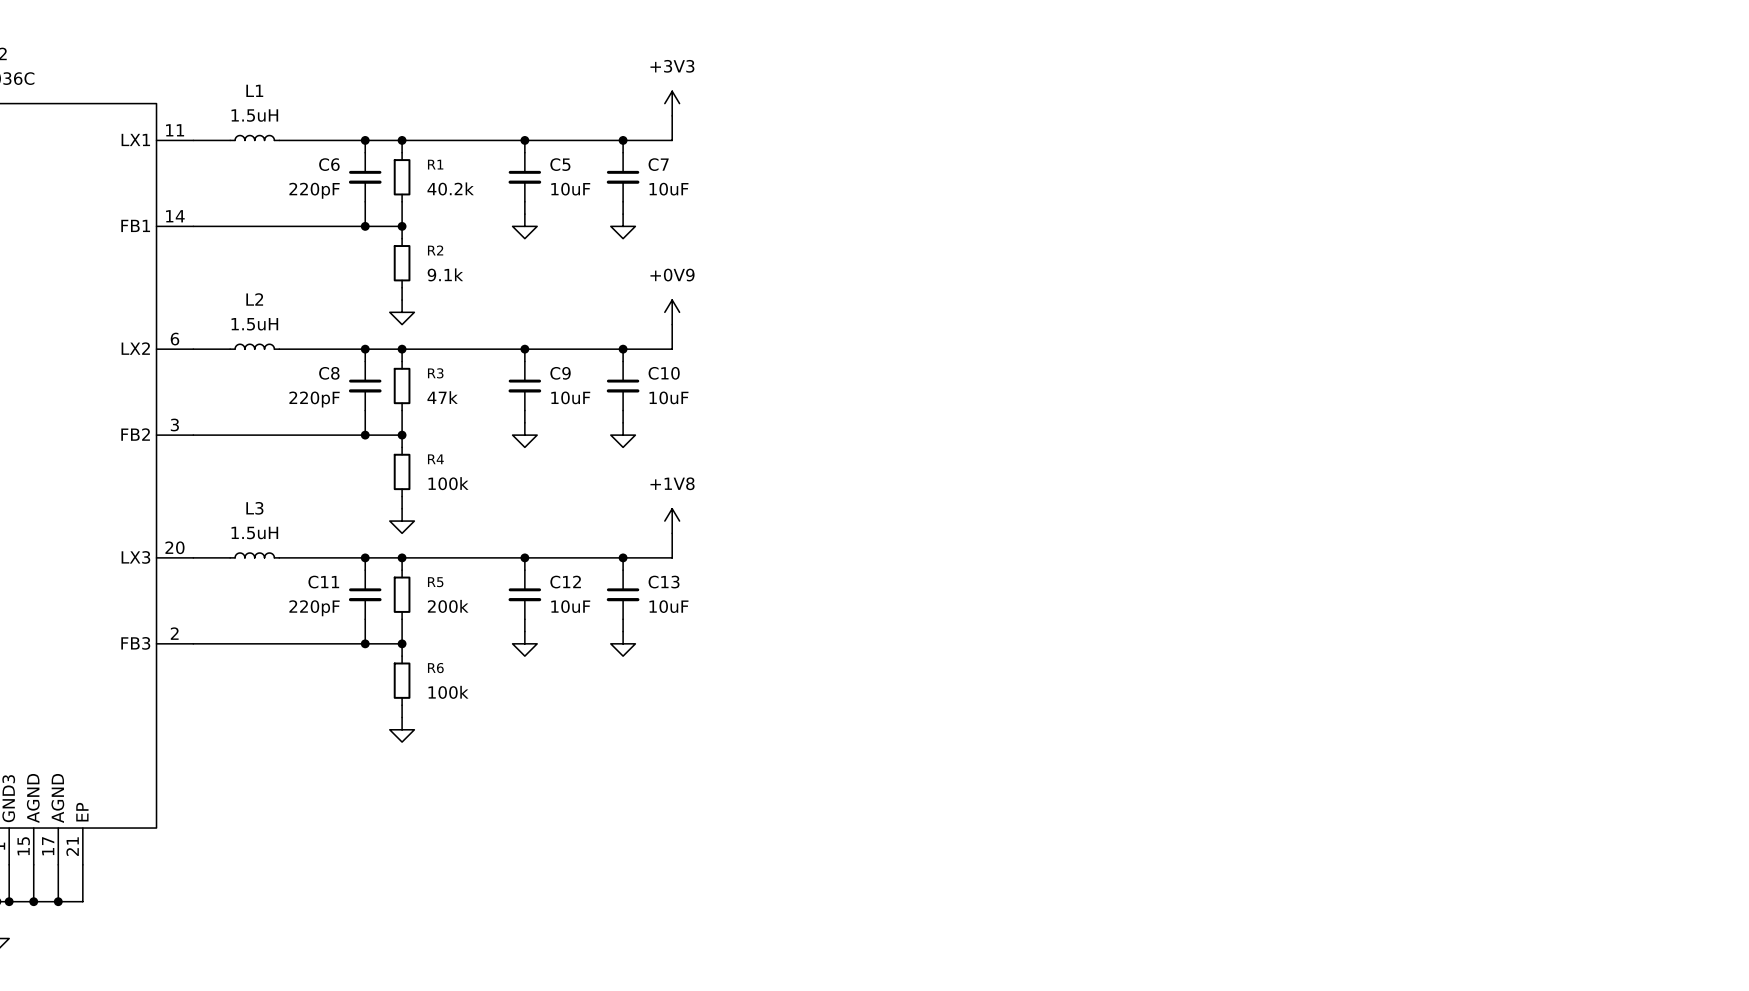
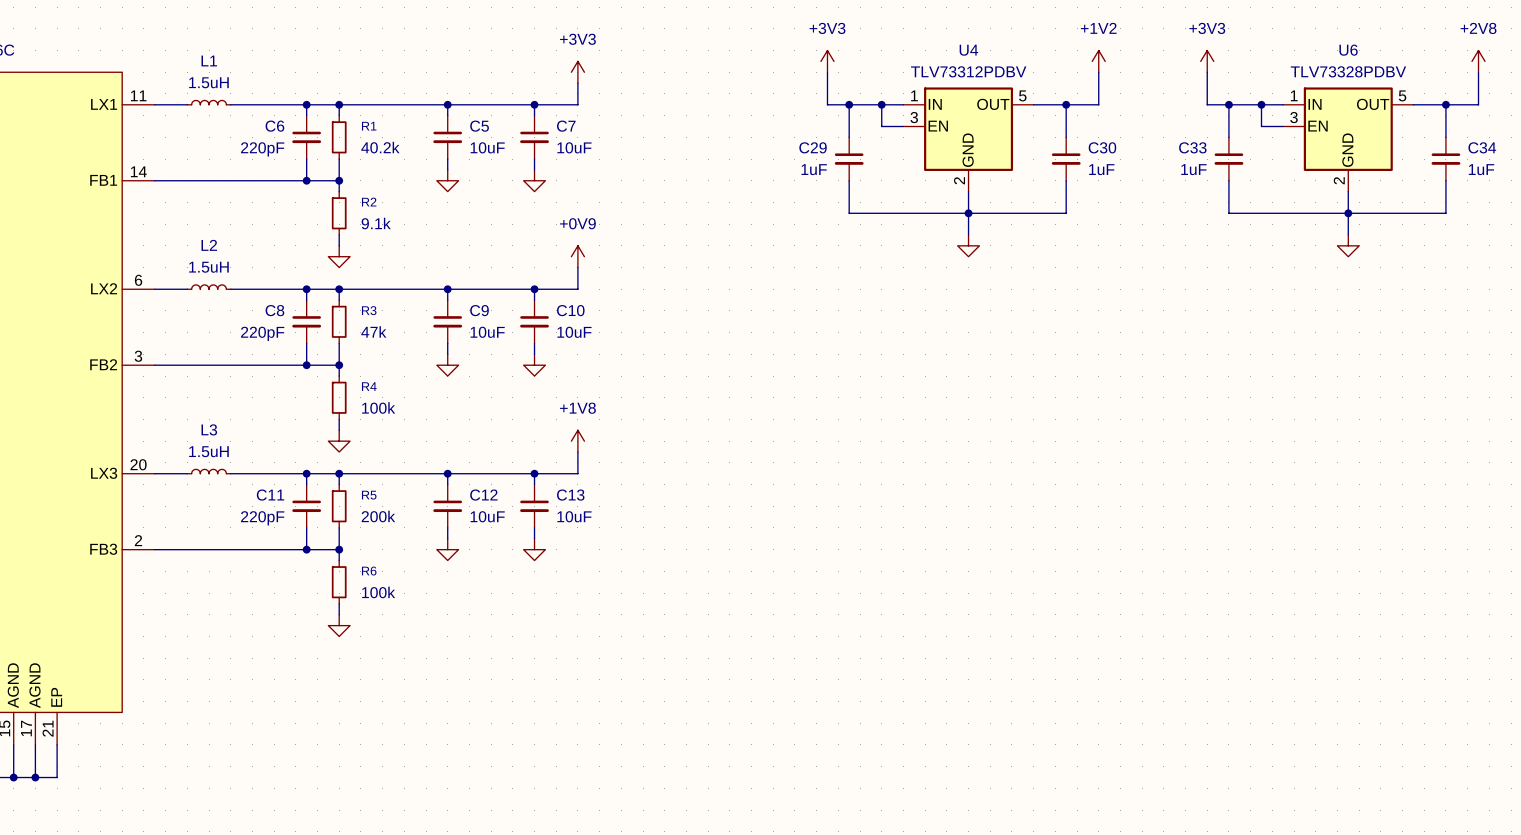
power symbol: none -> +3V3 (827, 61)
power symbol: none -> +1V2 (1098, 61)
power symbol: none -> +3V3 (1207, 61)
power symbol: none -> +2V8 (1478, 61)
wire: none -> (827, 72) (827, 104) (903, 104)
wire: none -> (1098, 72) (1098, 104) (1033, 104)
wire: none -> (1207, 72) (1207, 104) (1283, 104)
wire: none -> (1478, 72) (1478, 104) (1413, 104)
wire: none -> (849, 104) (849, 137)
junction: none -> (849, 104)
wire: none -> (881, 104) (881, 126) (903, 126)
junction: none -> (881, 104)
wire: none -> (1066, 104) (1066, 137)
junction: none -> (1066, 104)
wire: none -> (1228, 104) (1228, 137)
junction: none -> (1228, 104)
wire: none -> (1261, 104) (1261, 126) (1283, 126)
junction: none -> (1261, 104)
wire: none -> (1445, 104) (1445, 137)
junction: none -> (1445, 104)
U4: none -> TLV73312PDBV (968, 139)
U6: none -> TLV73328PDBV (1348, 139)
C29: none -> 1uF (849, 159)
C30: none -> 1uF (1066, 159)
C33: none -> 1uF (1228, 159)
C34: none -> 1uF (1445, 159)
wire: none -> (849, 180) (849, 213) (1066, 213) (1066, 180)
wire: none -> (1228, 180) (1228, 213) (1445, 213) (1445, 180)
wire: none -> (968, 191) (968, 235)
wire: none -> (1348, 191) (1348, 235)
junction: none -> (968, 213)
junction: none -> (1348, 213)
power symbol: none -> (968, 245)
power symbol: none -> (1348, 245)

